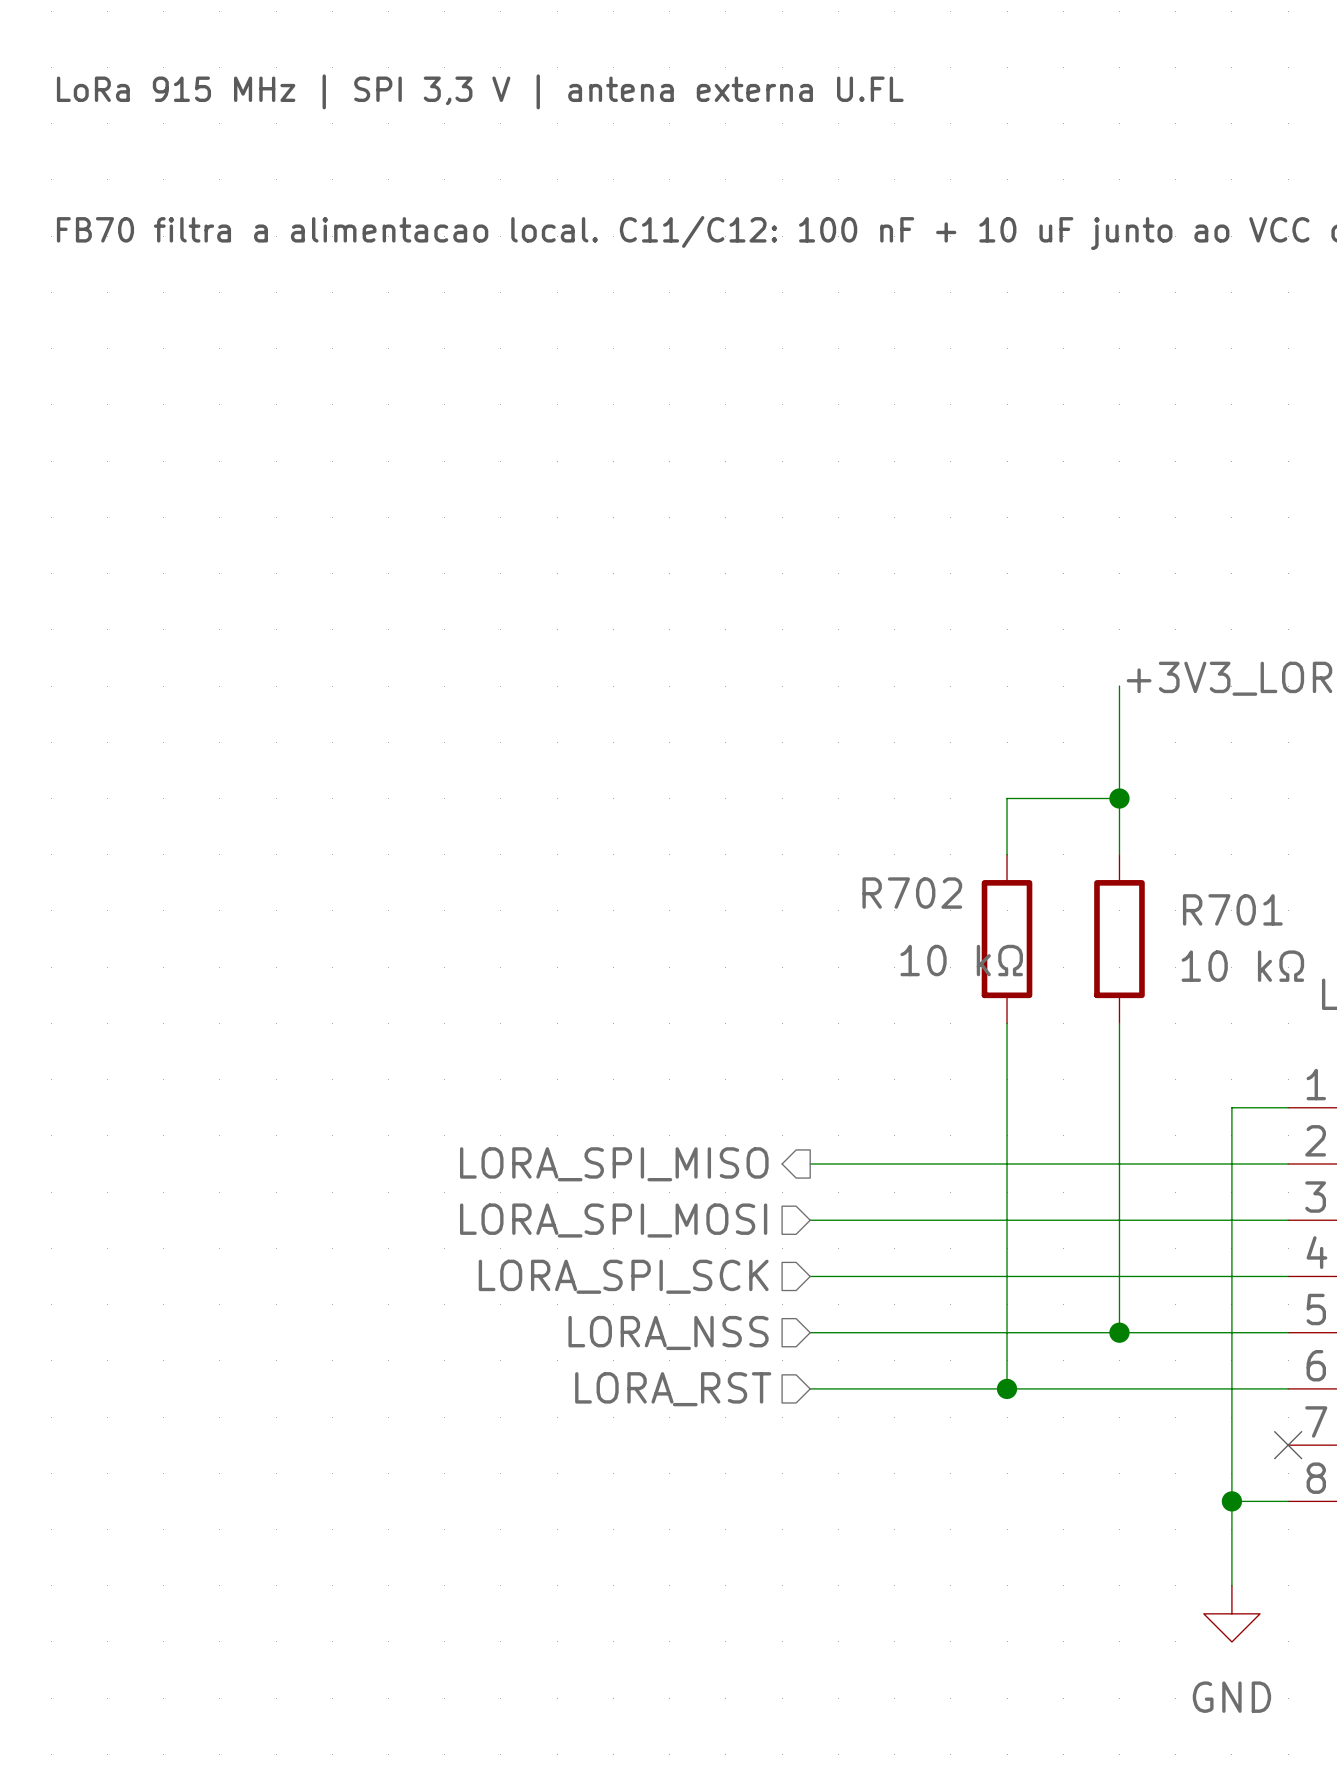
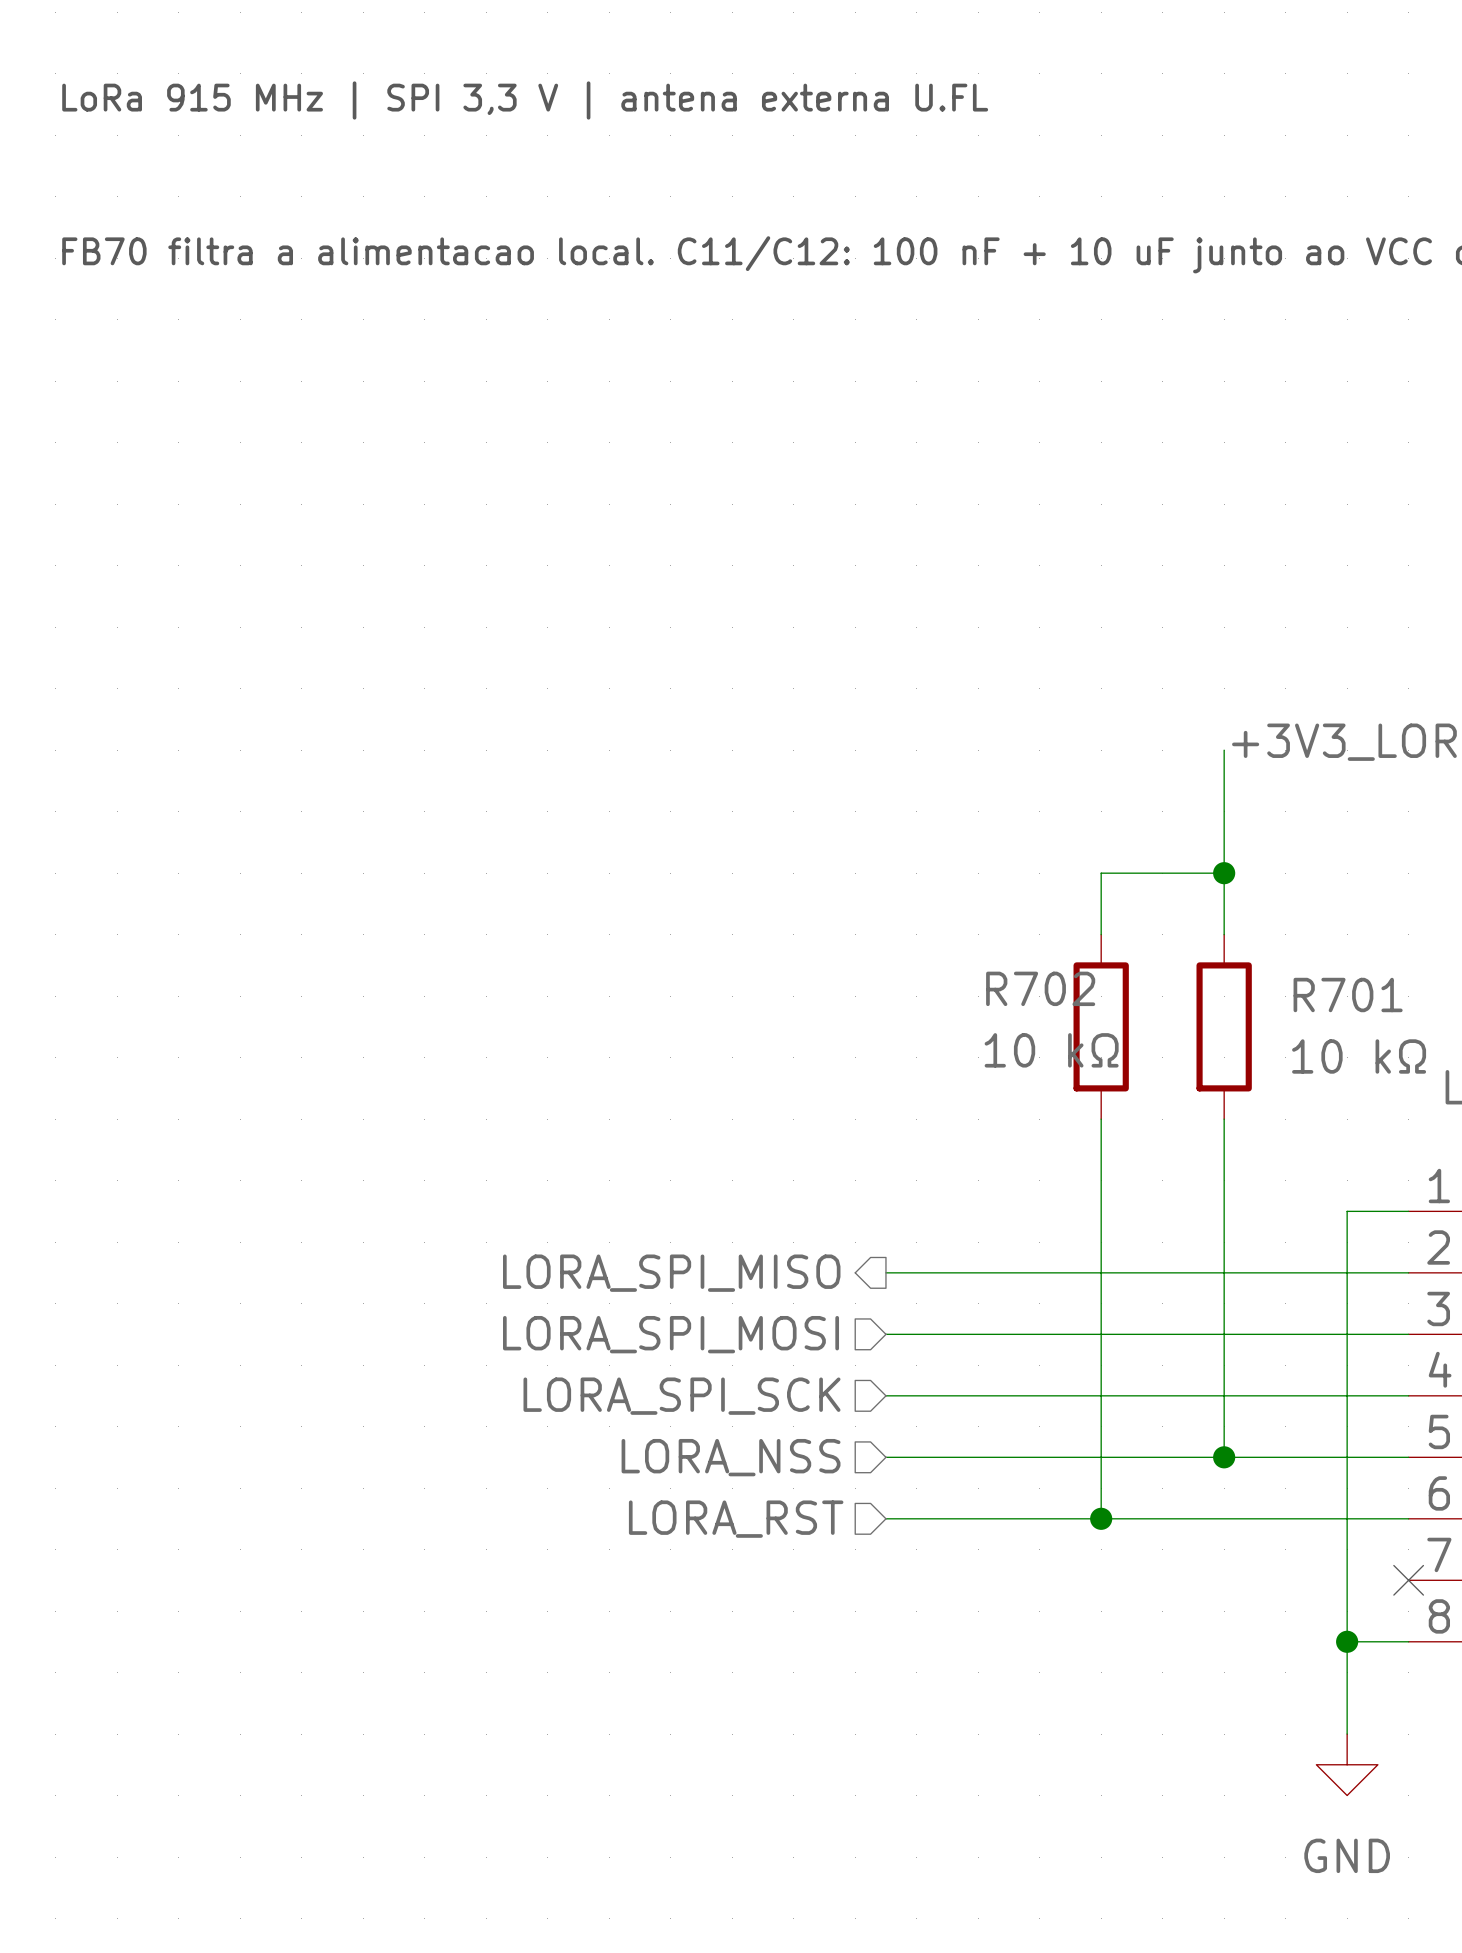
R702 name position: R702 (912, 893) -> R702 (1040, 988)

